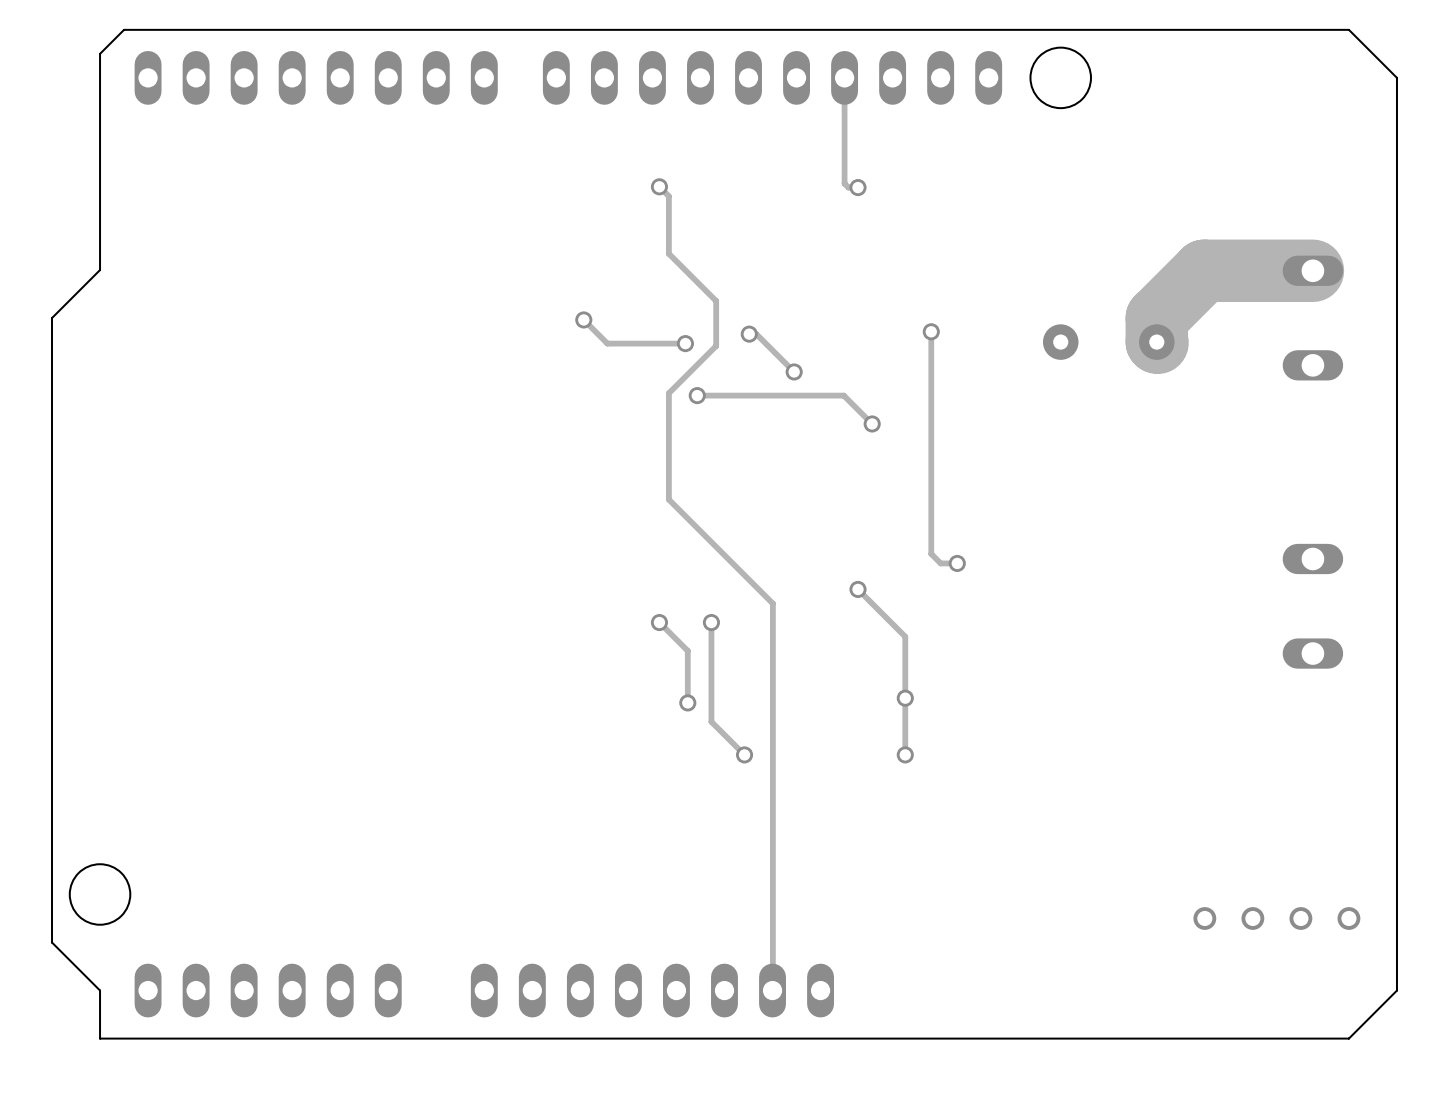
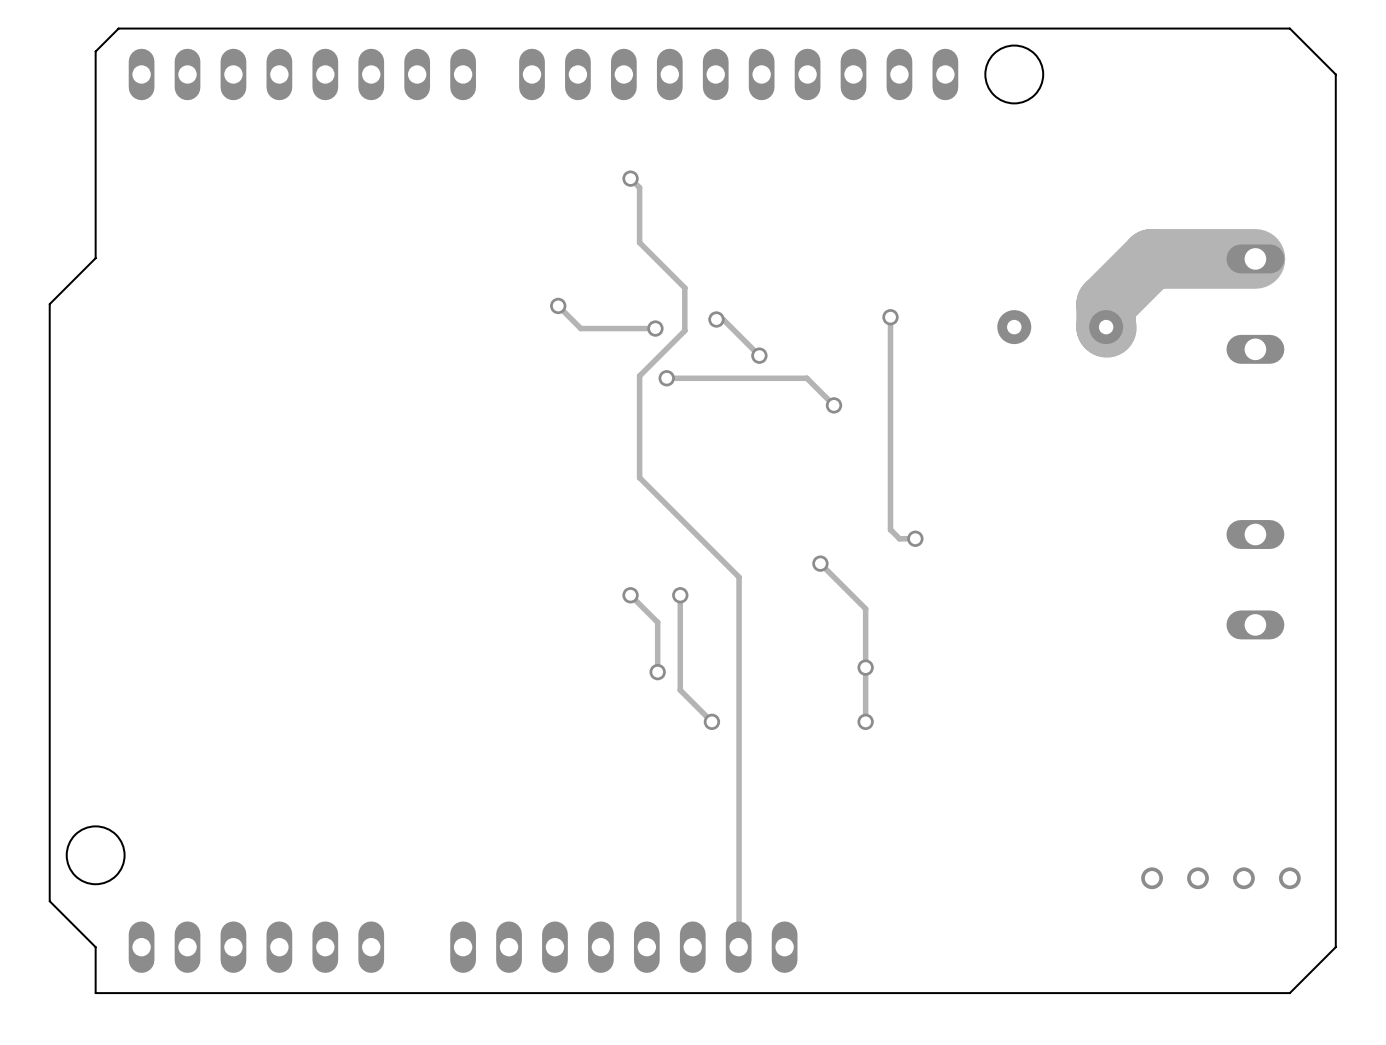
track: (844, 77) (844, 183) (848, 187) (858, 187) -> none
via: (858, 187) -> none

